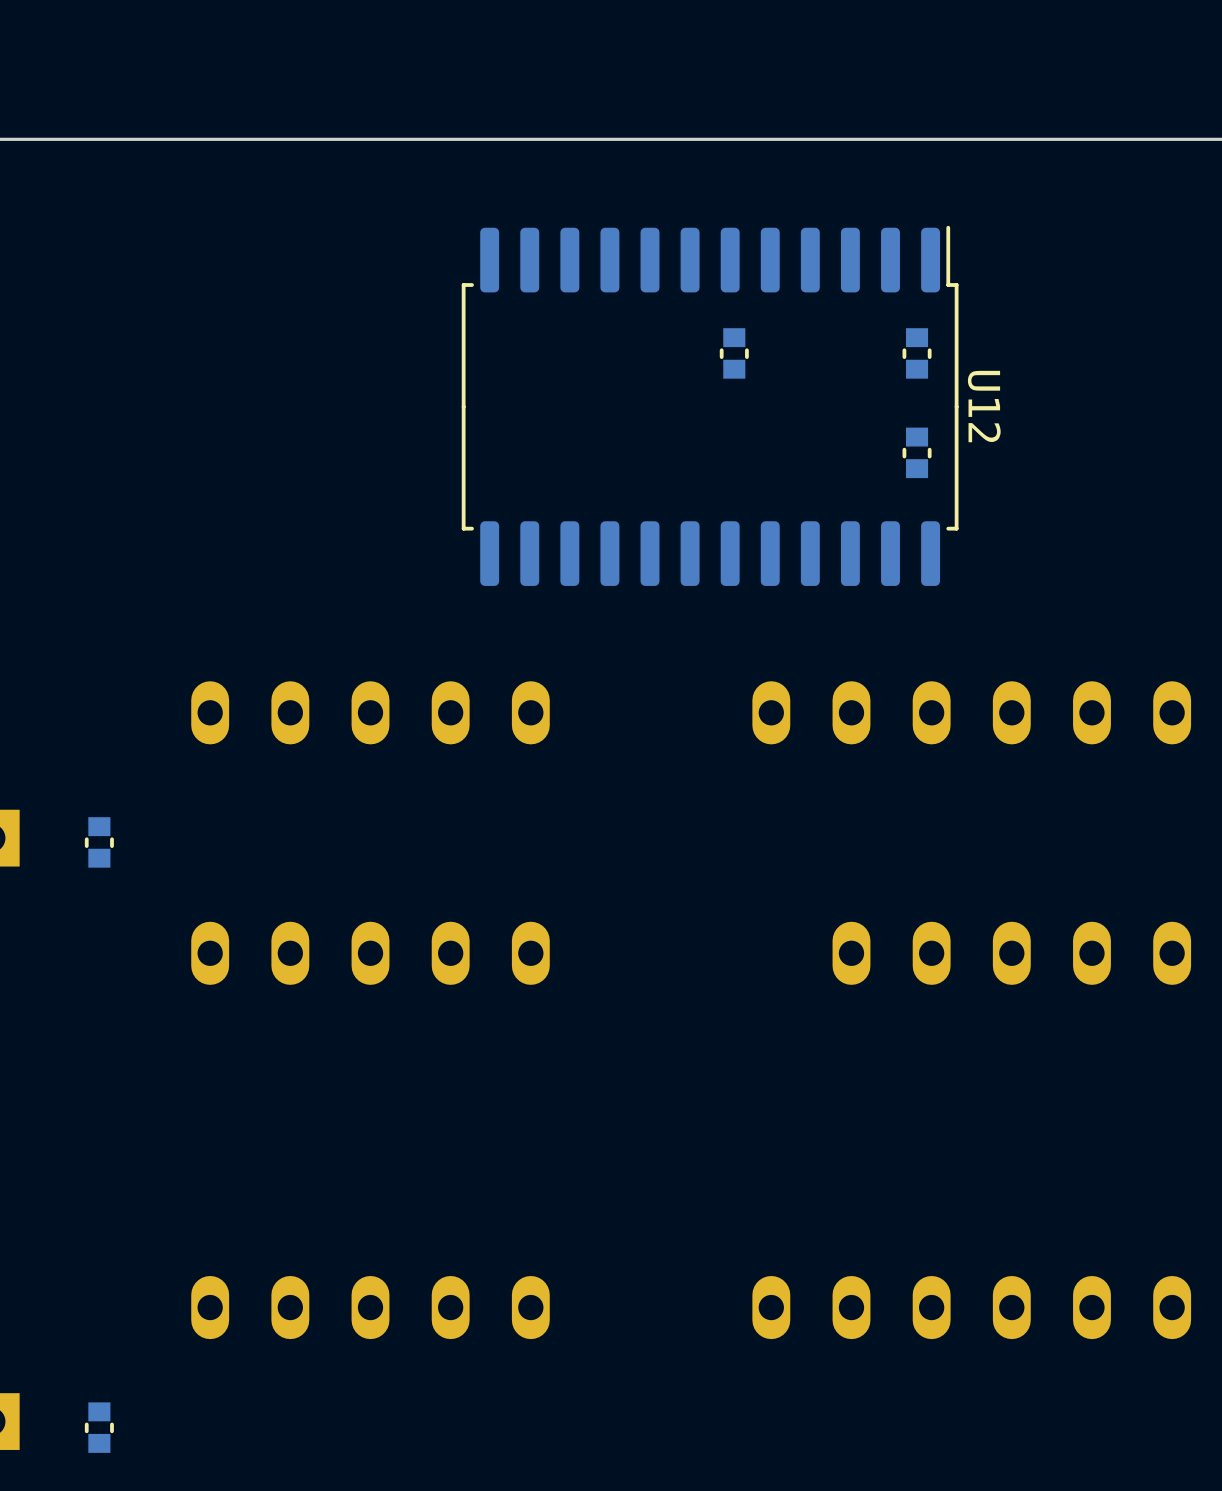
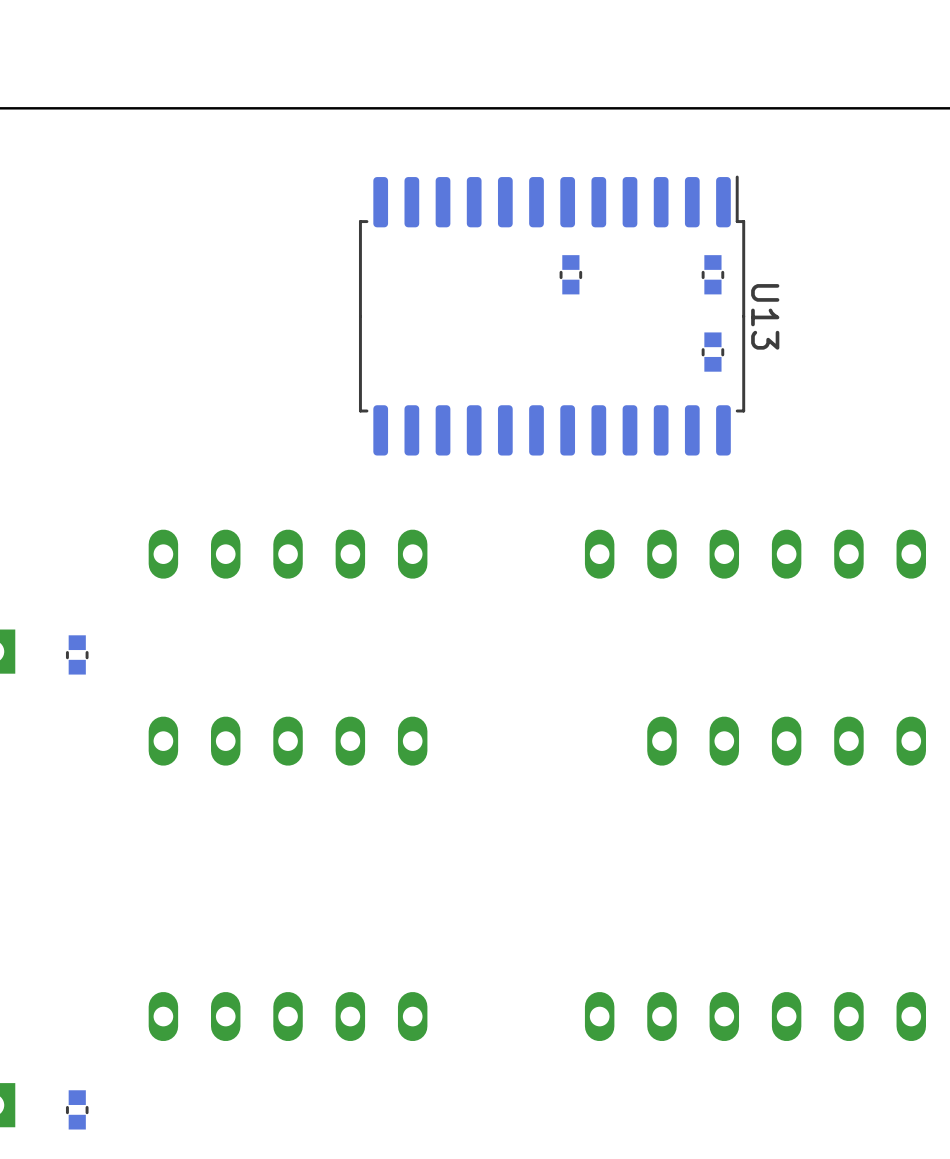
U12 name: U12 (984, 406) -> U13 (765, 316)

